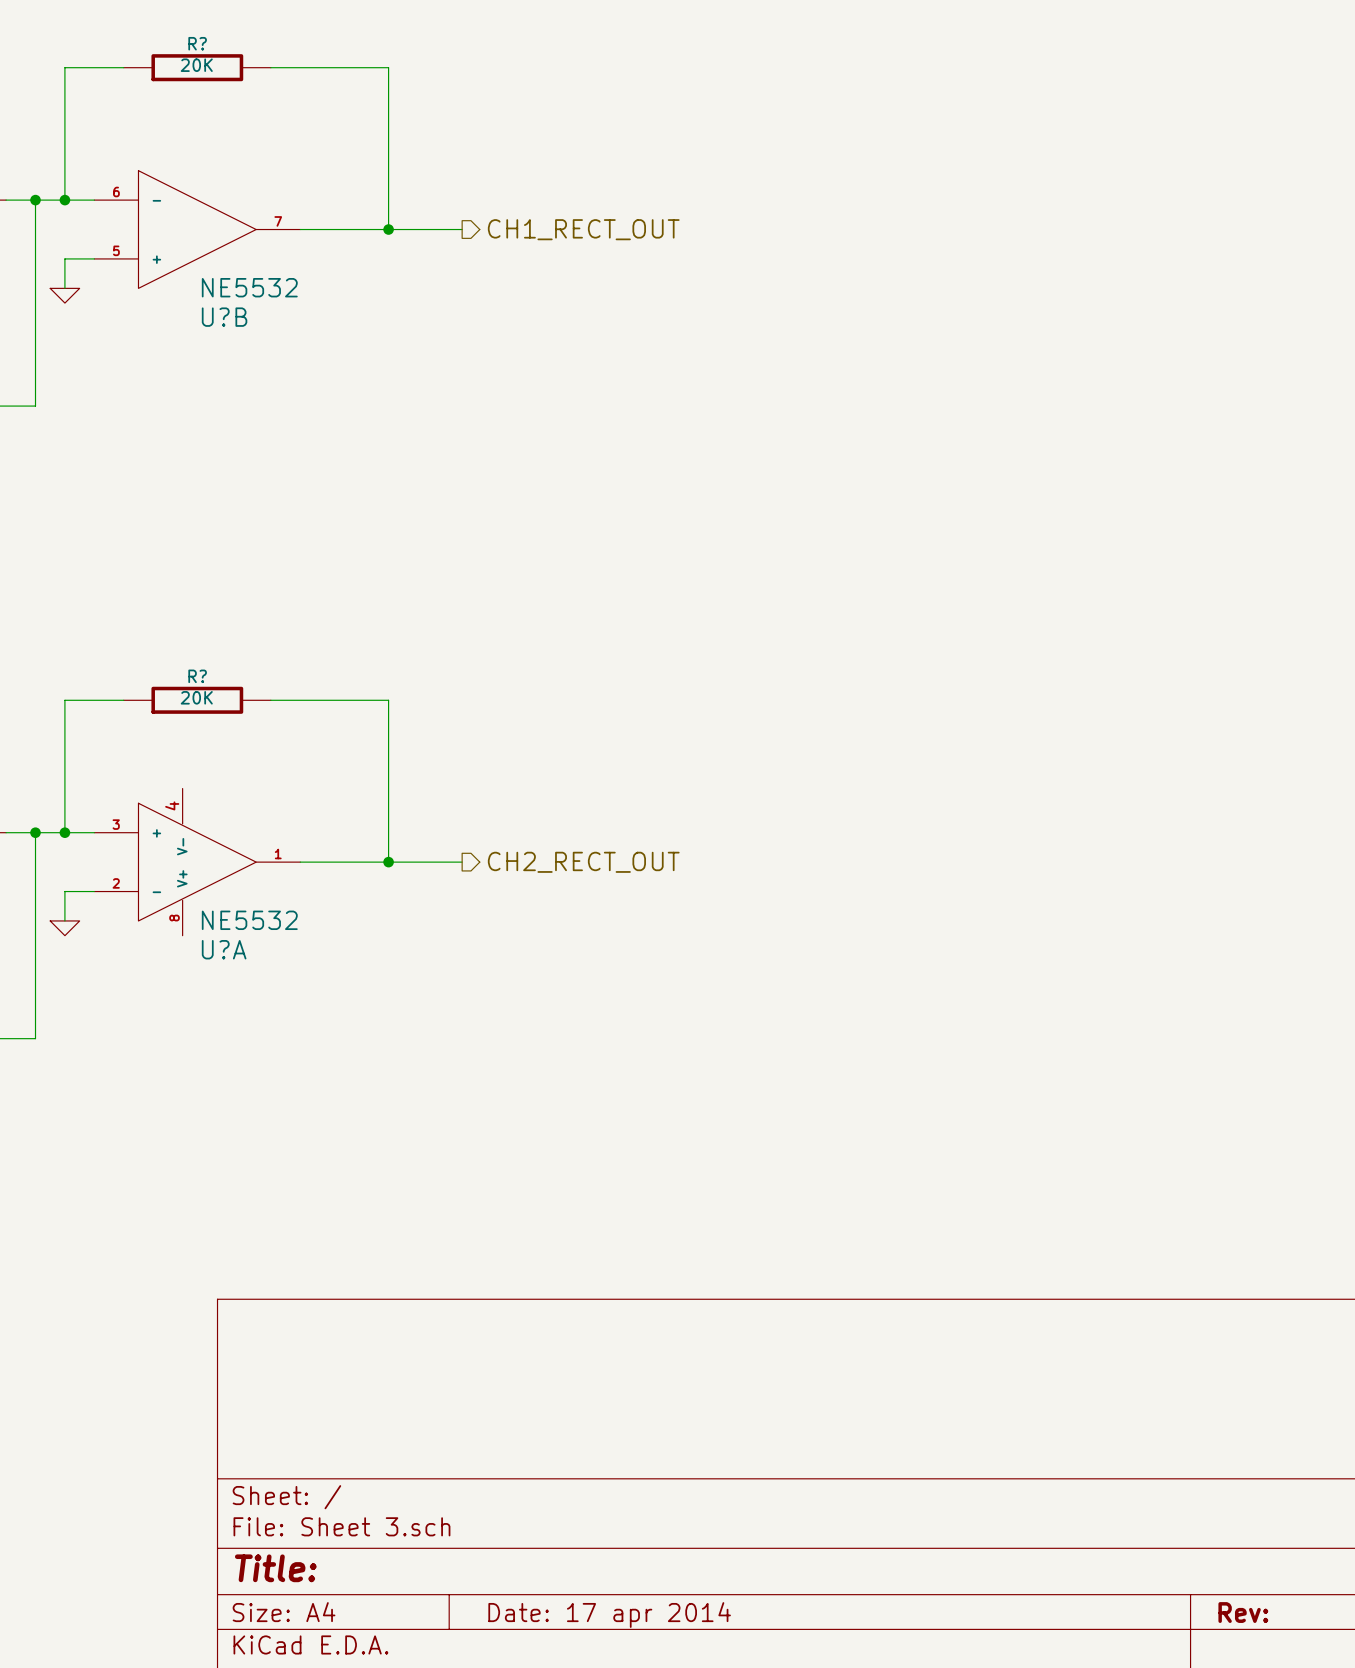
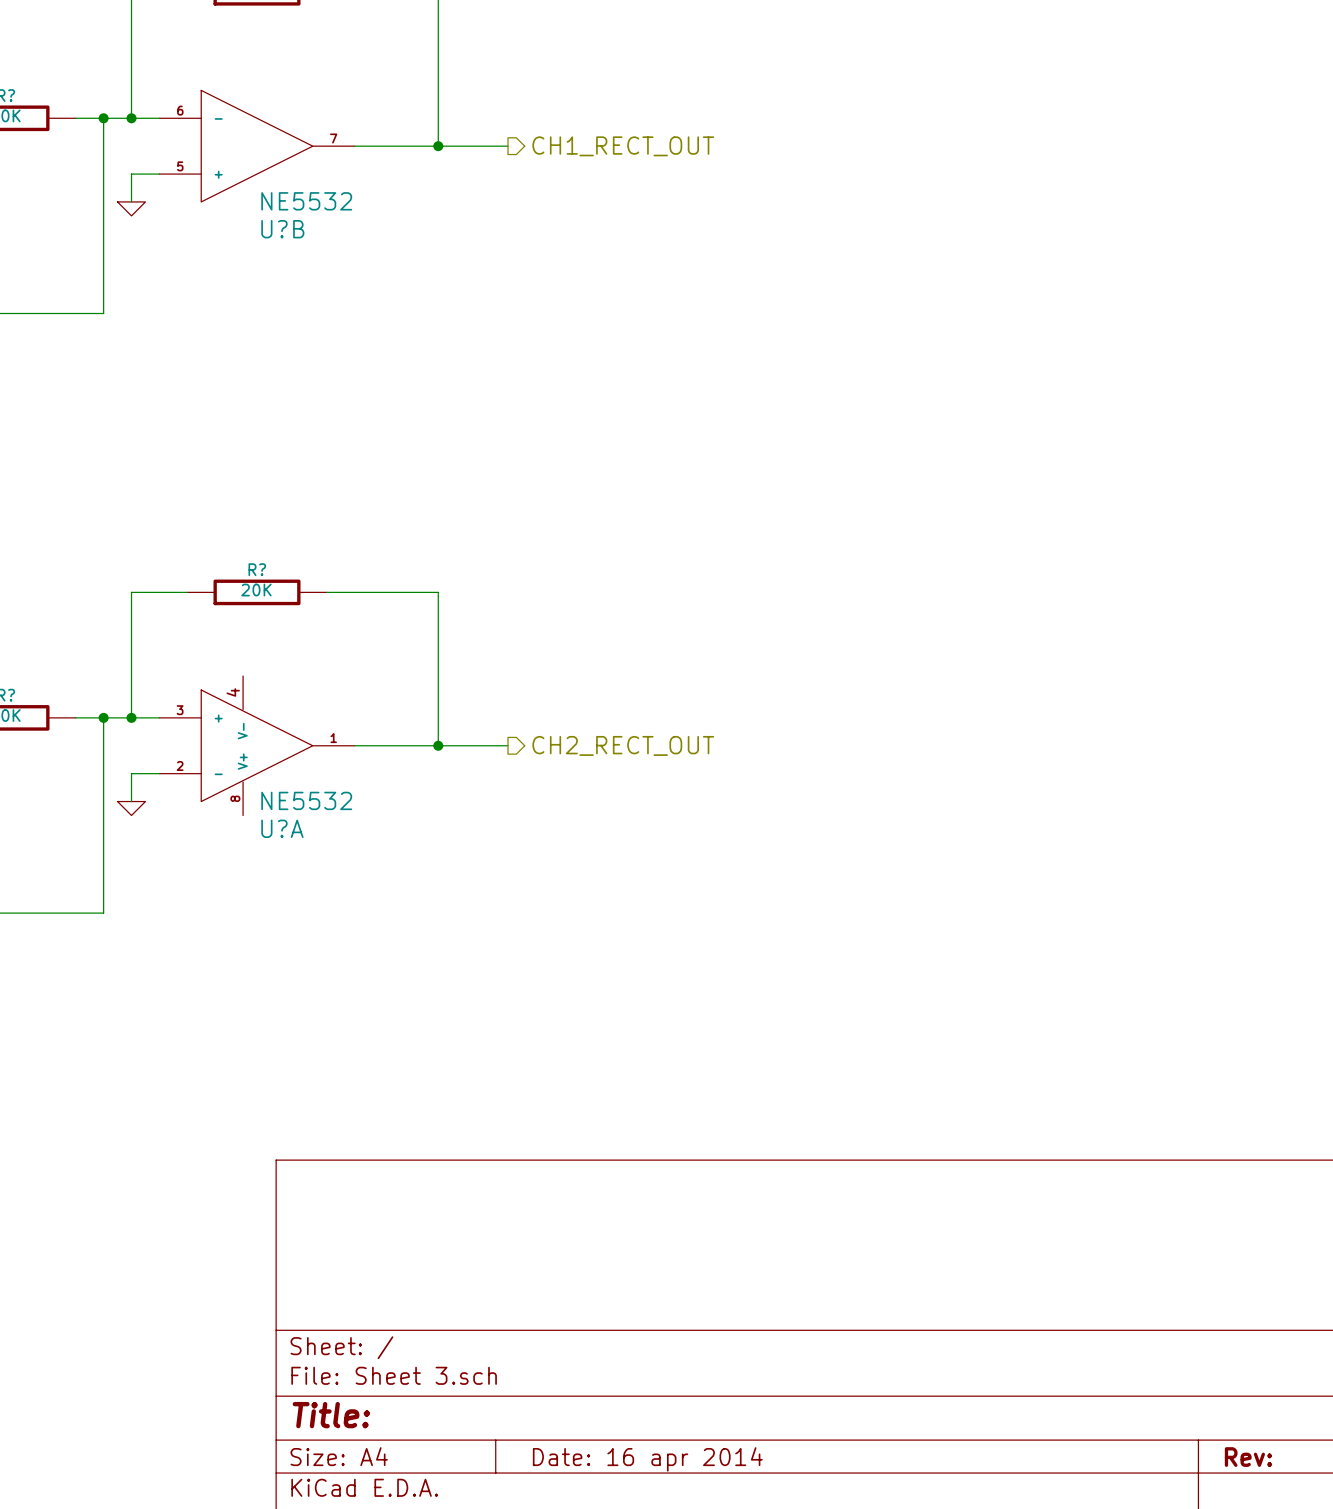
title block: Date: 17 apr 2014 (609, 1615) -> Date: 16 apr 2014 (647, 1459)

